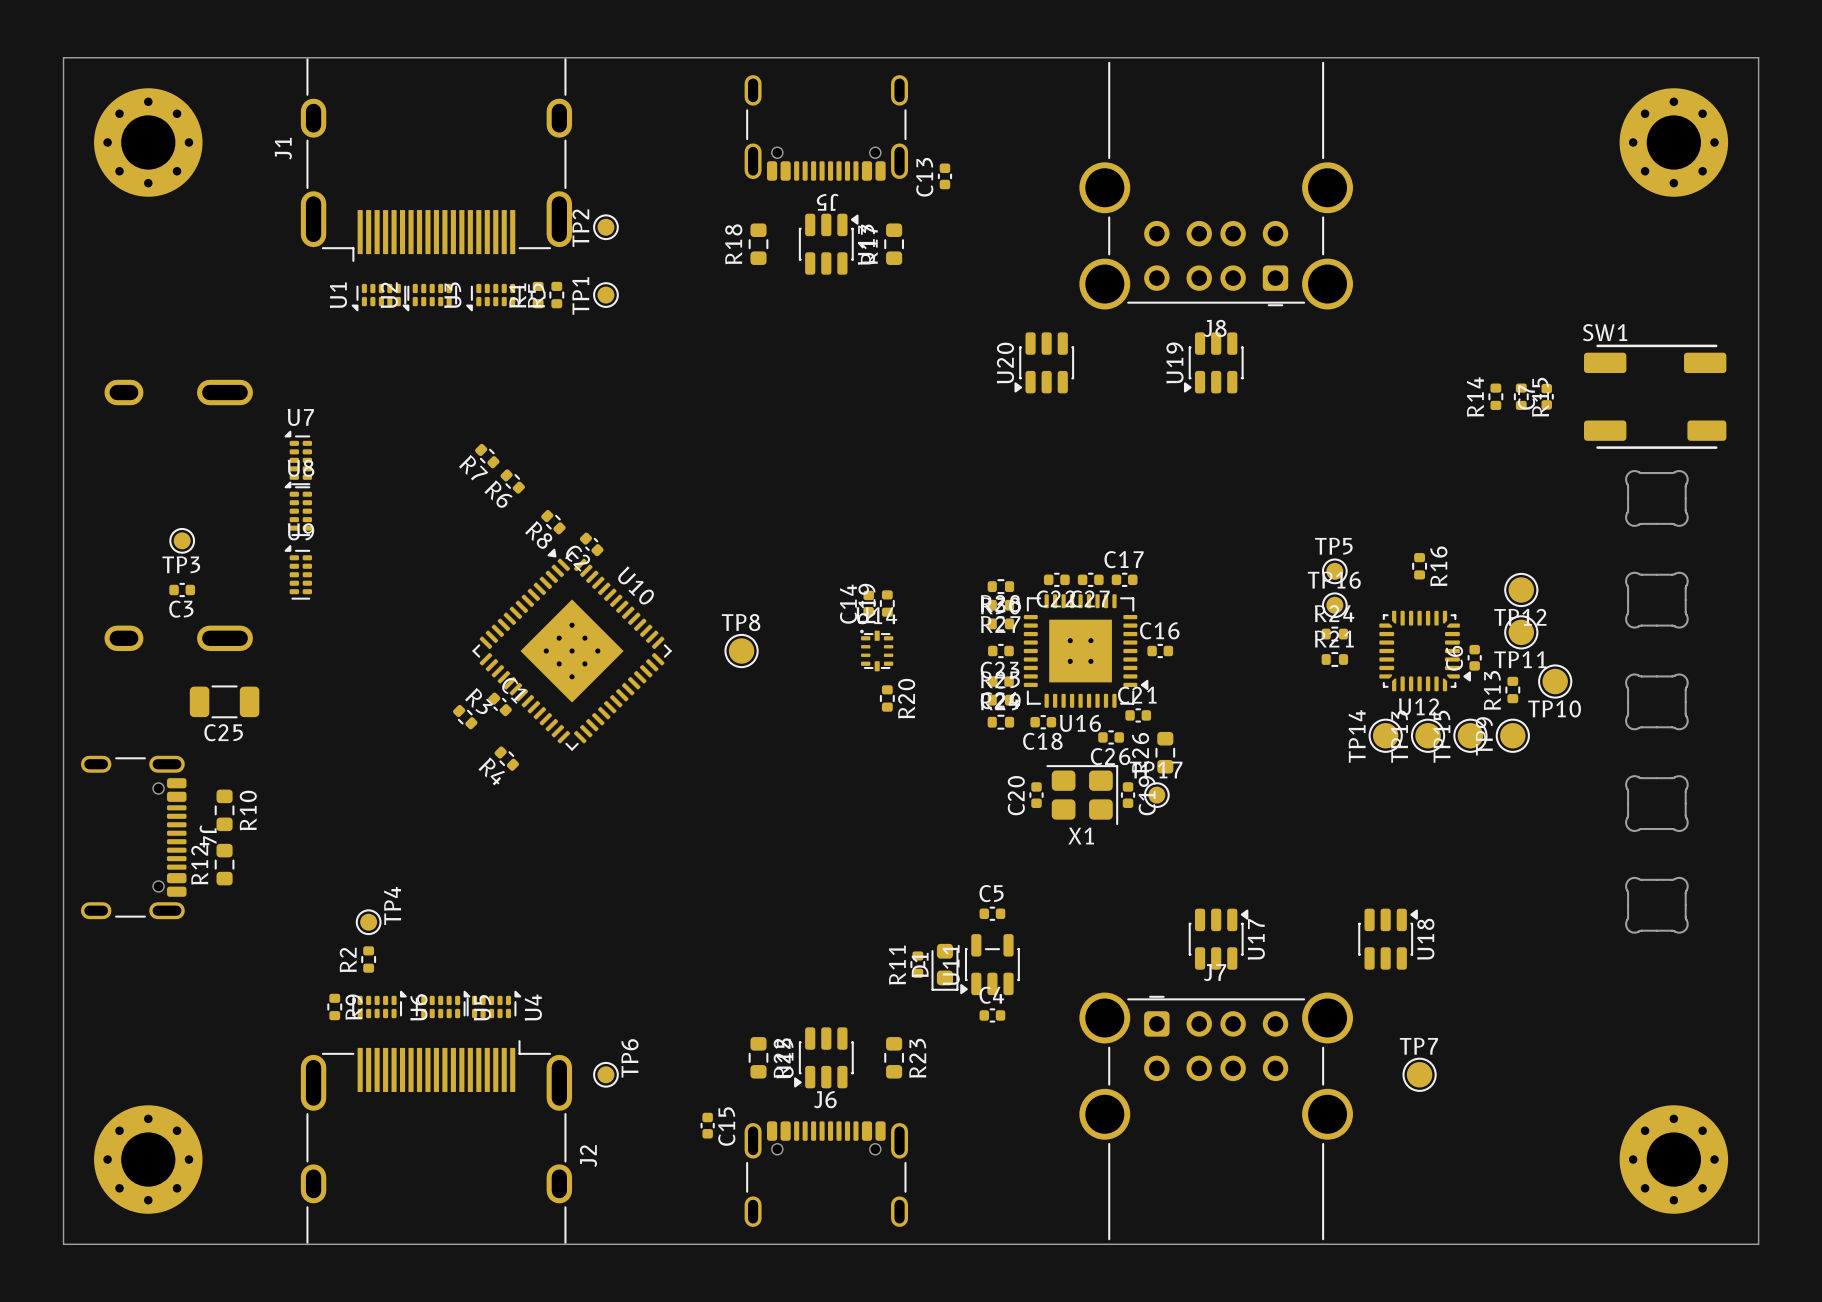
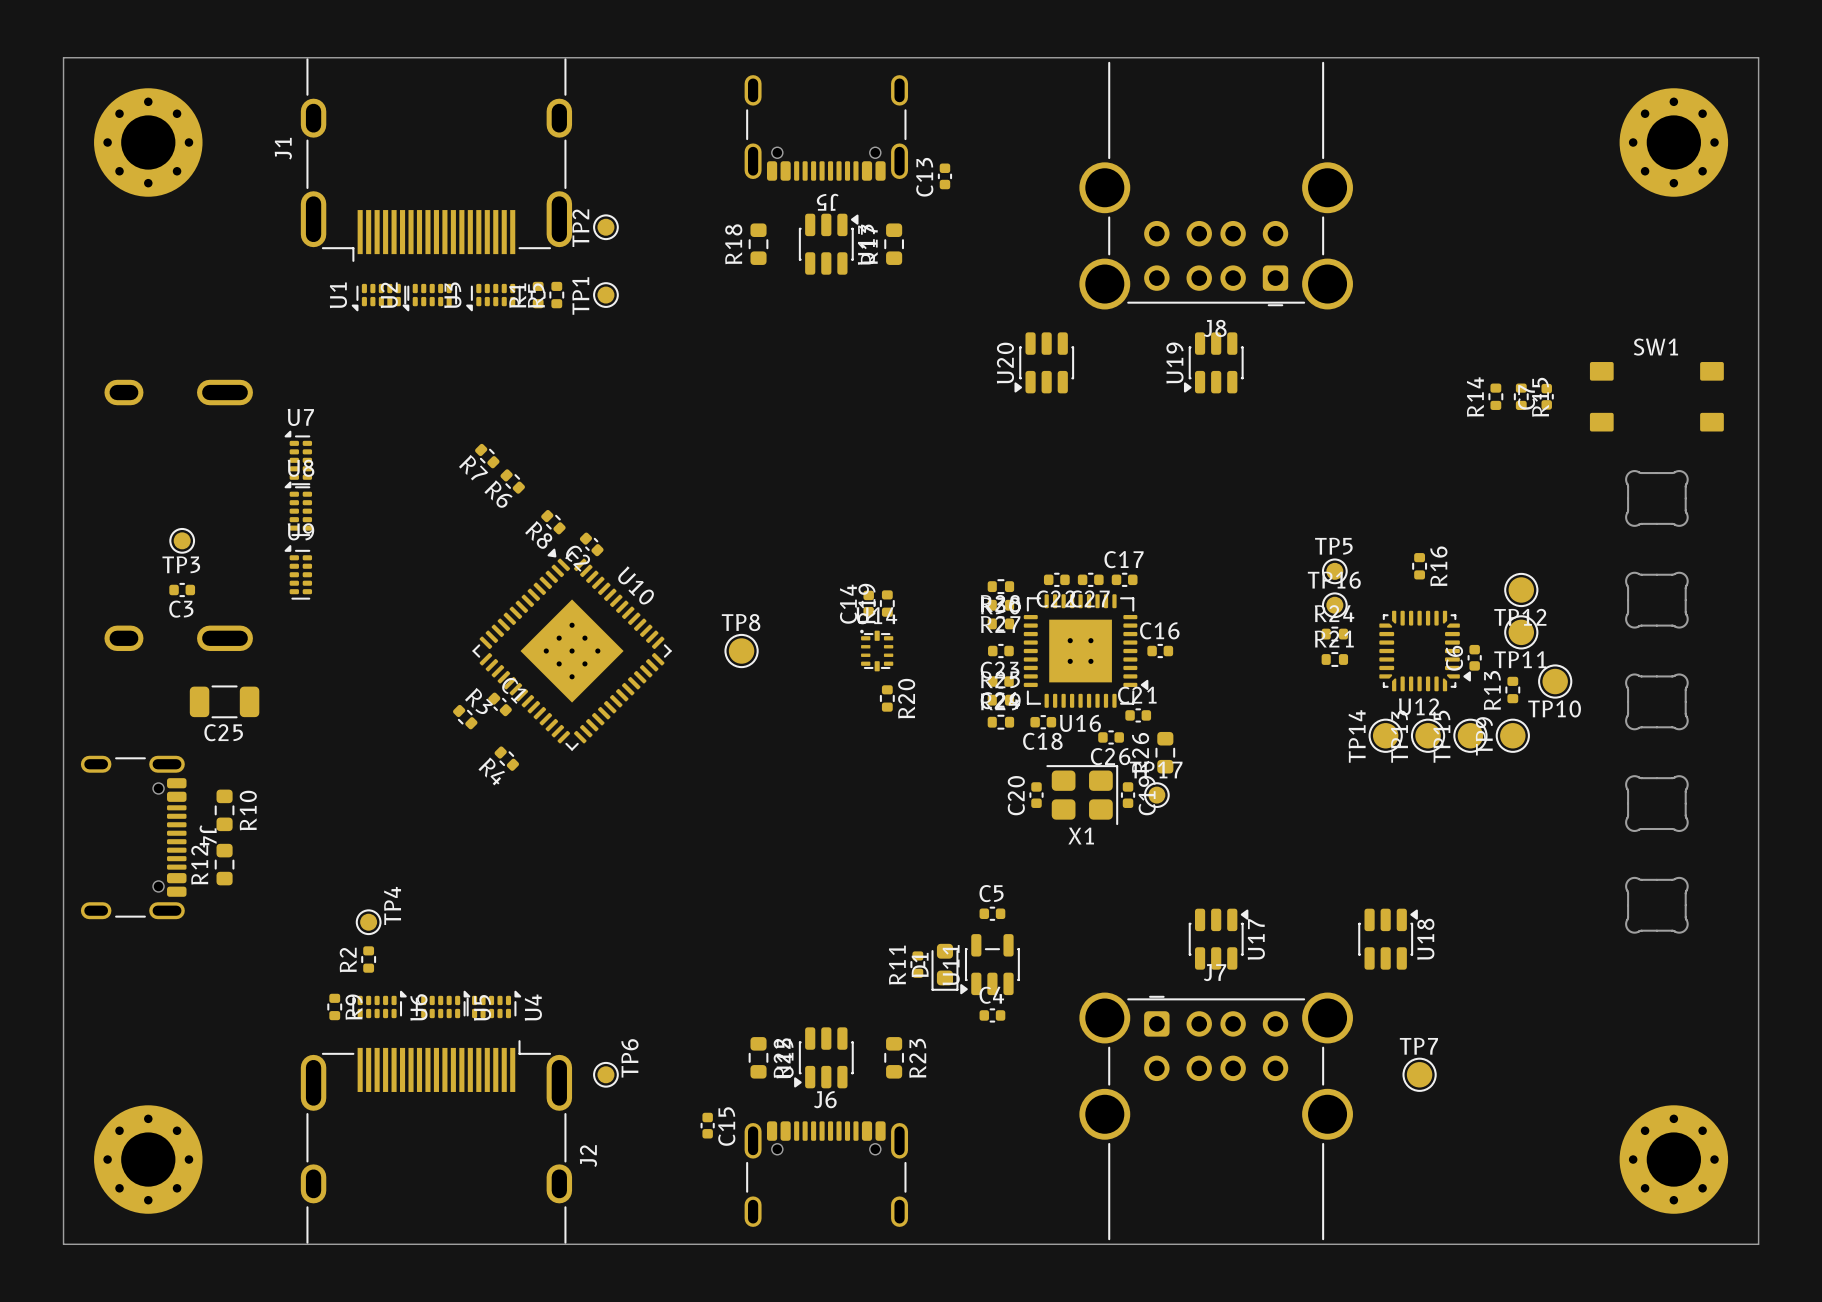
SW1 name position: SW1 (1605, 332) -> SW1 (1655, 347)
SW1 footprint: [1584, 344, 1727, 449] -> [1589, 362, 1724, 432]

